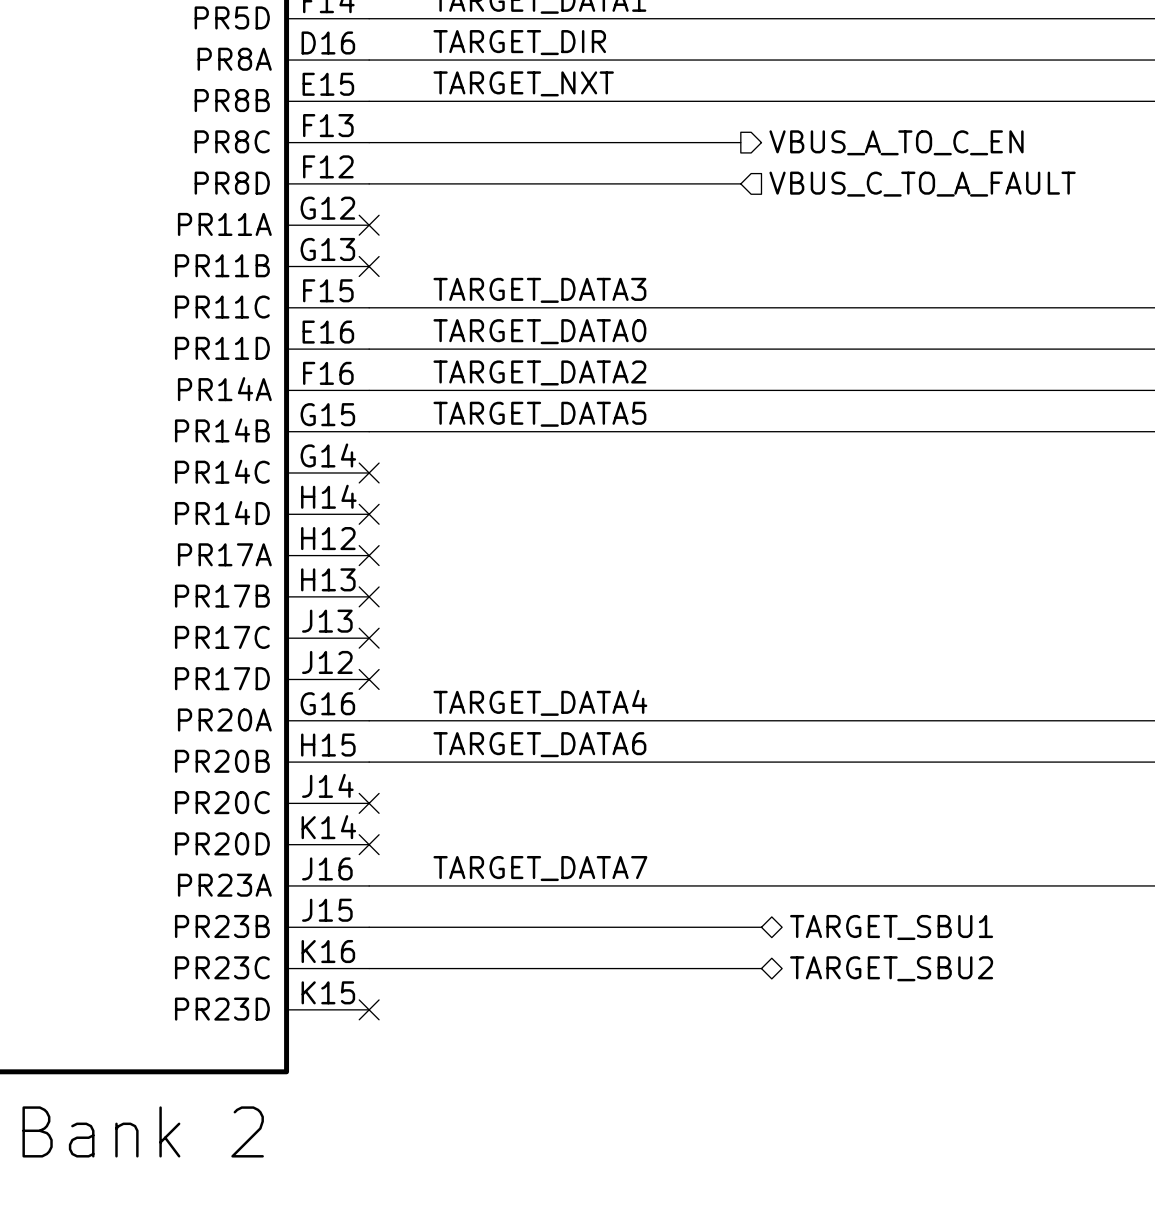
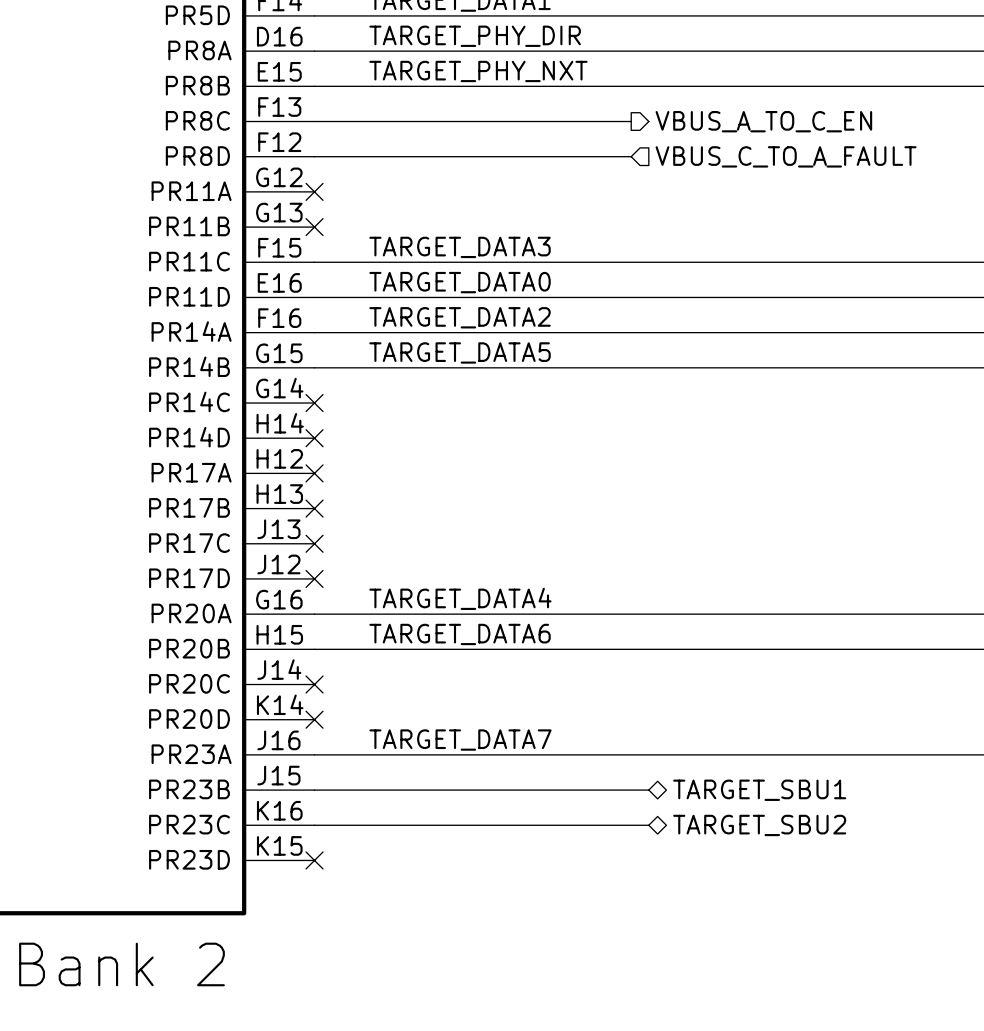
label: TARGET_DIR (519, 42) -> TARGET_PHY_DIR (475, 36)
label: TARGET_NXT (523, 83) -> TARGET_PHY_NXT (478, 71)

